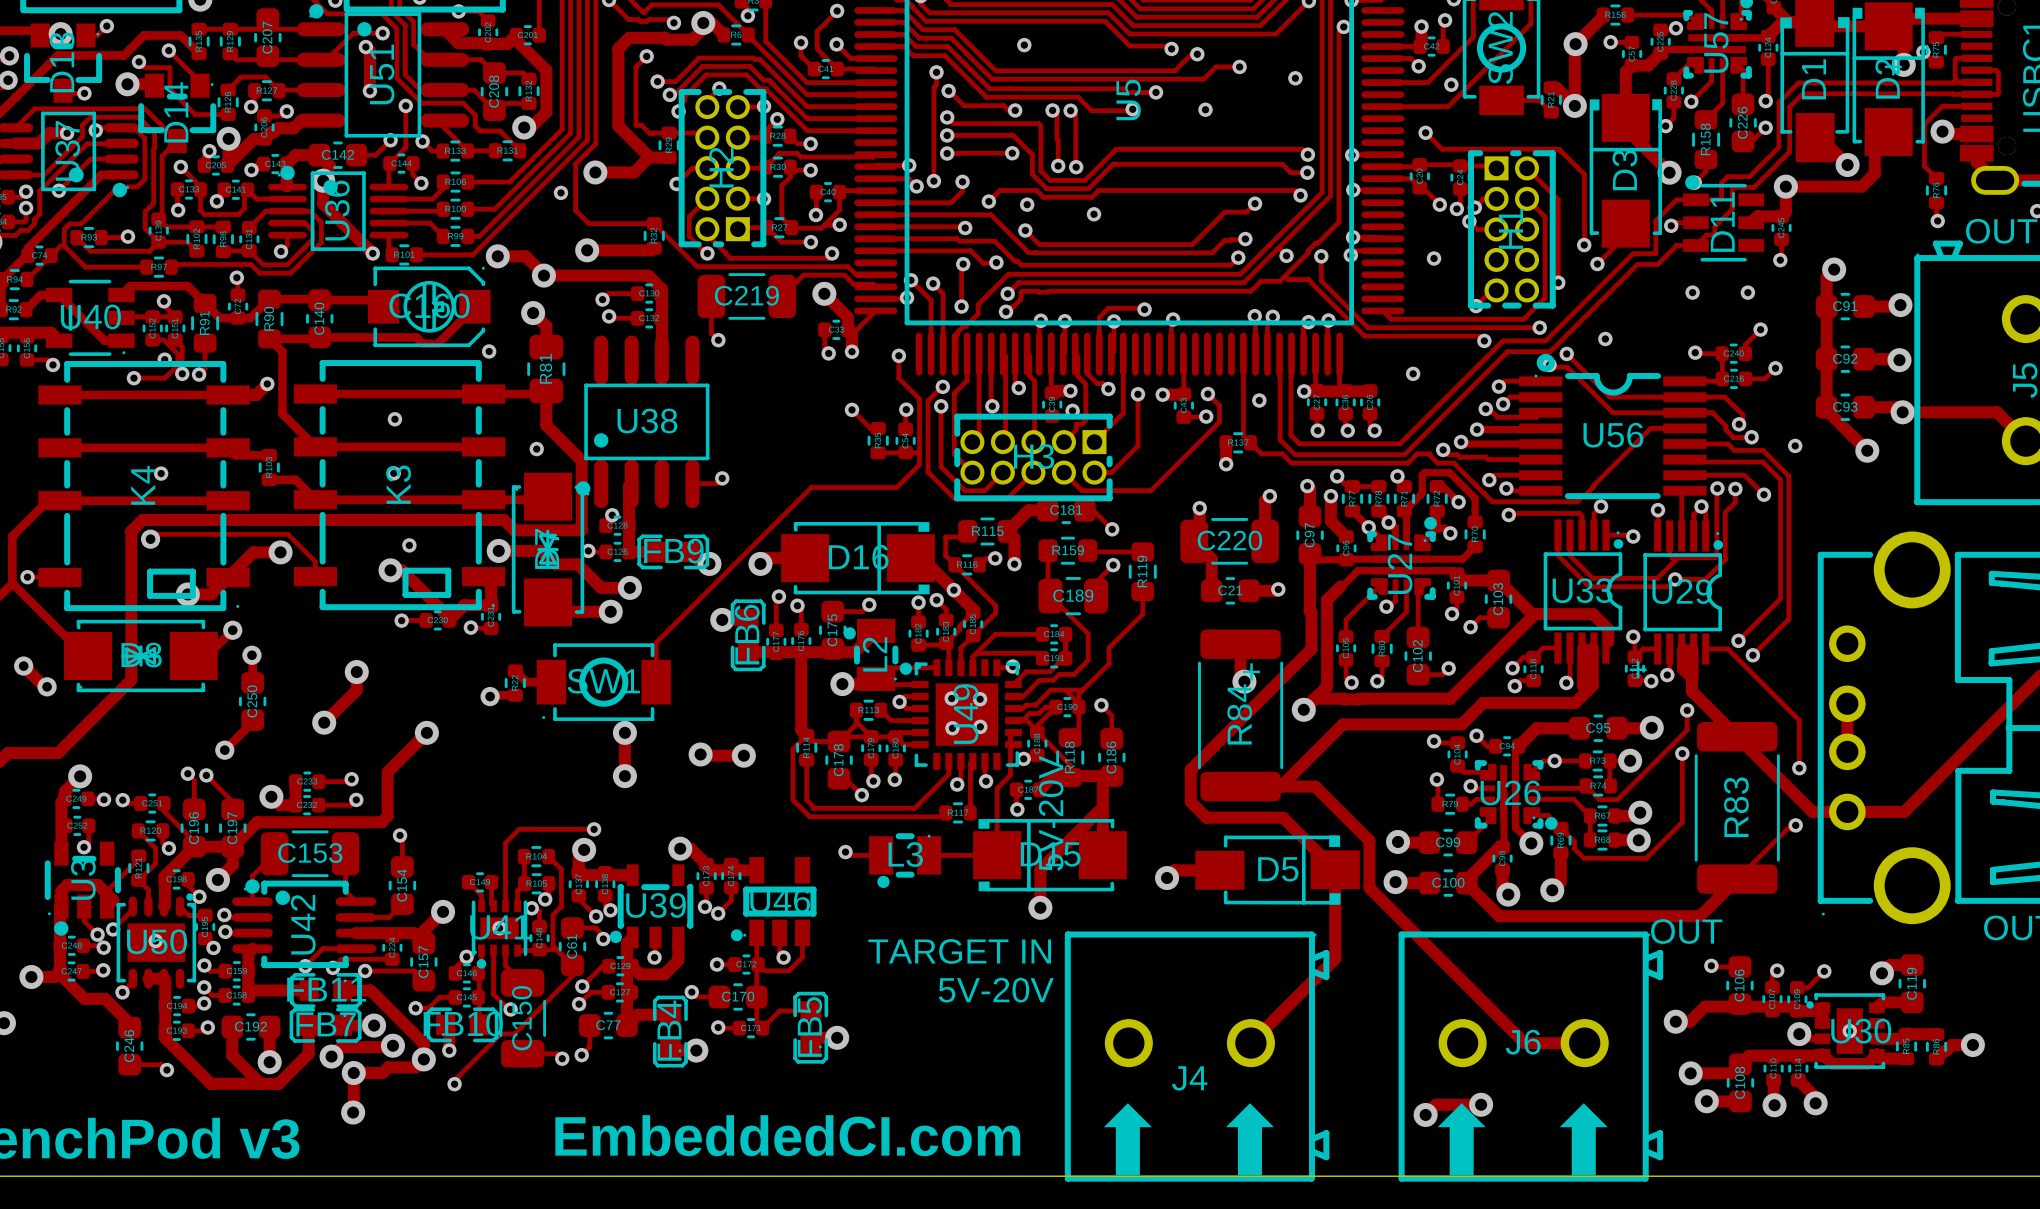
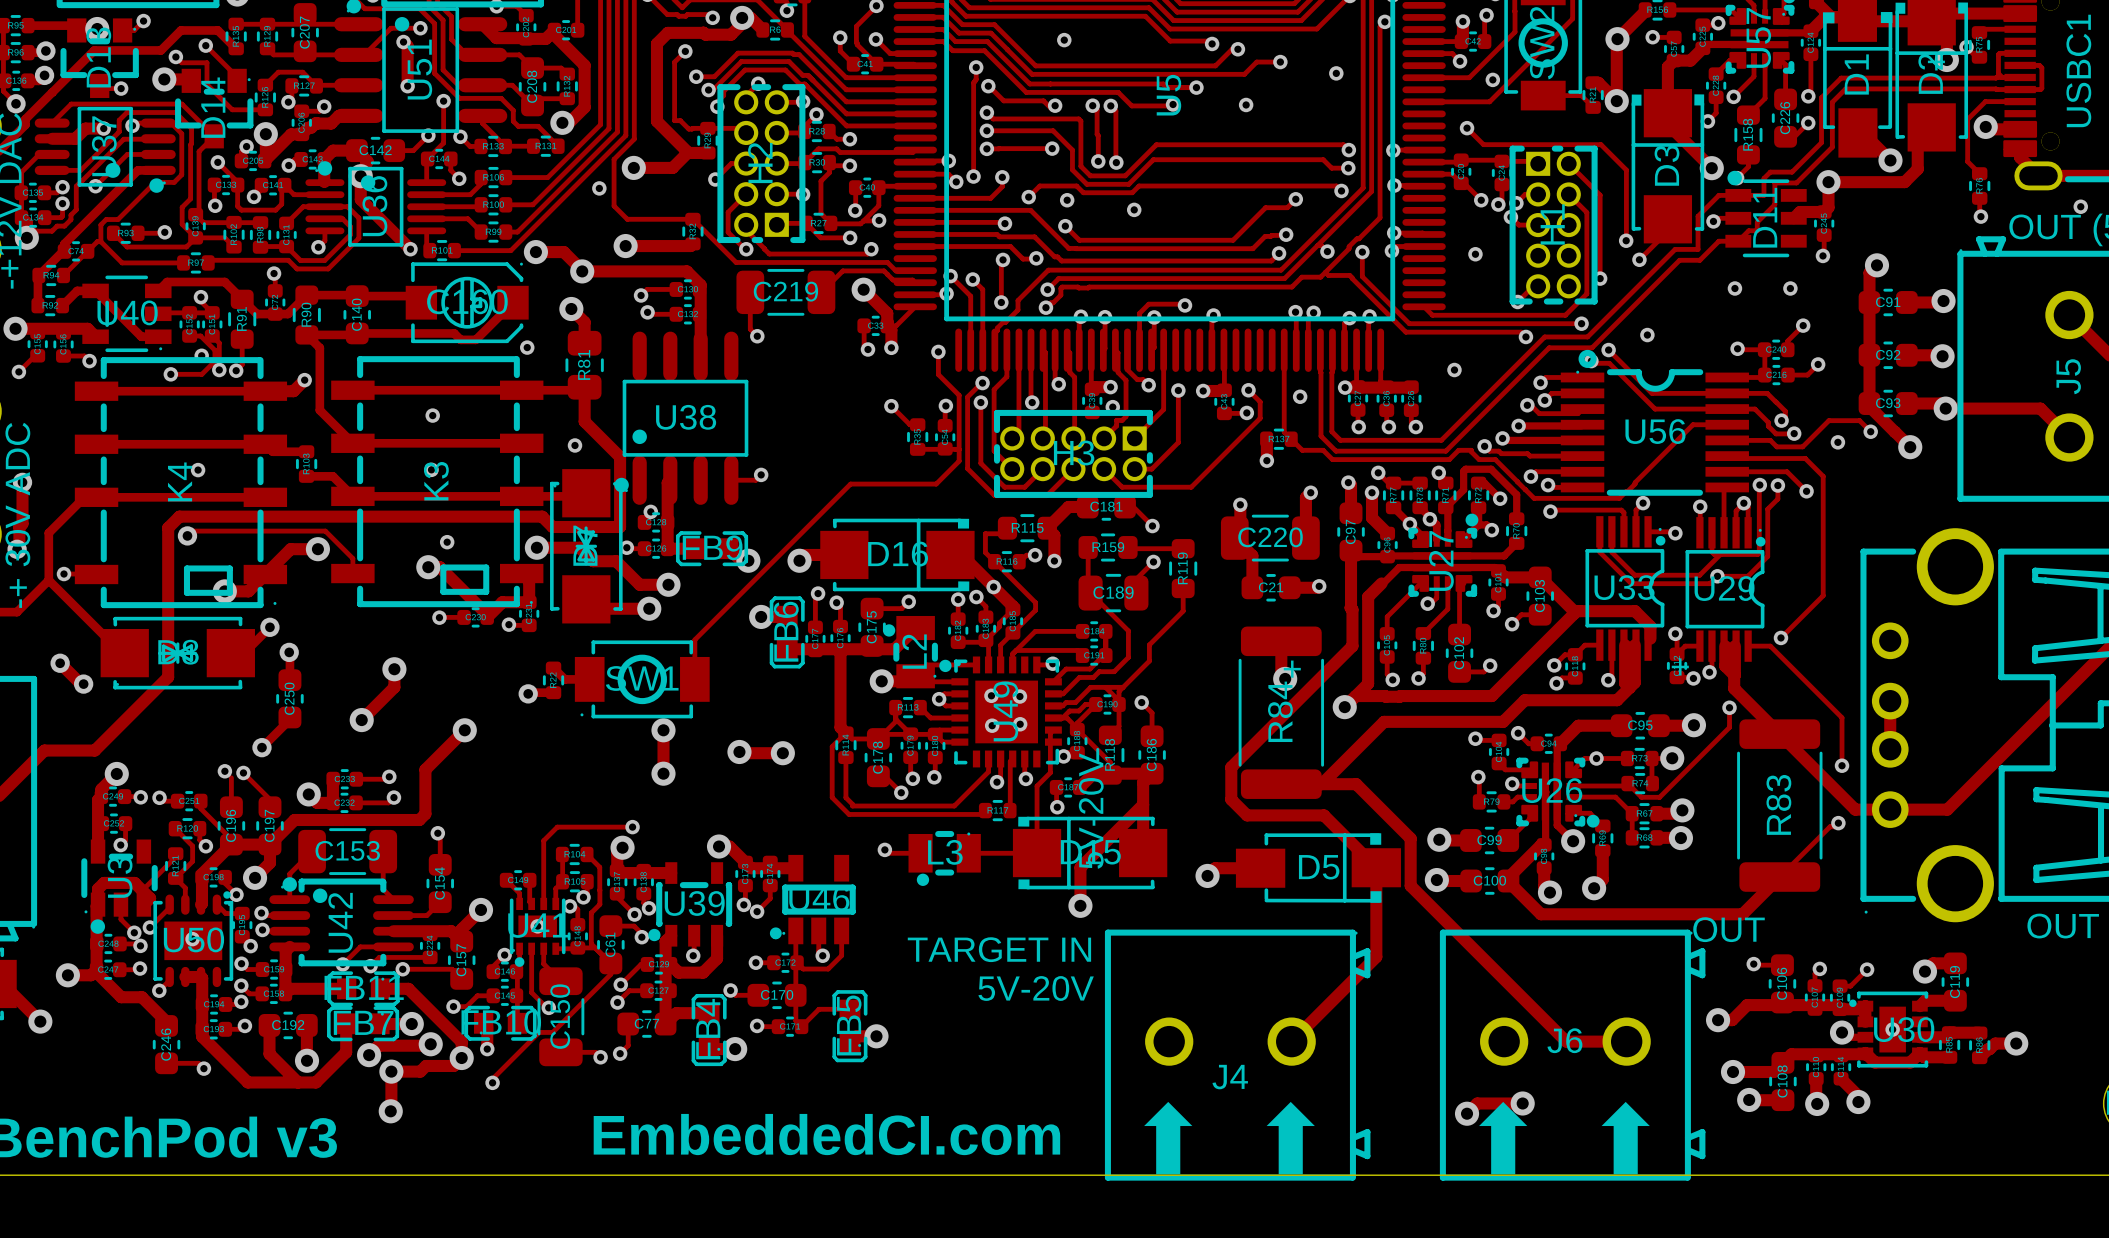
via: none -> (1870, 431)
track: (1760, 450) (1763, 450) (1788, 476) (1788, 619) (1752, 655) -> (1802, 446) (1828, 420) (1859, 420) (1870, 431)
via: (1752, 655) -> none
track: (1682, 753) (1682, 822) (1646, 858) (1583, 858) (1574, 848) (1574, 841) (1560, 828) -> none
via: (1682, 753) -> none

